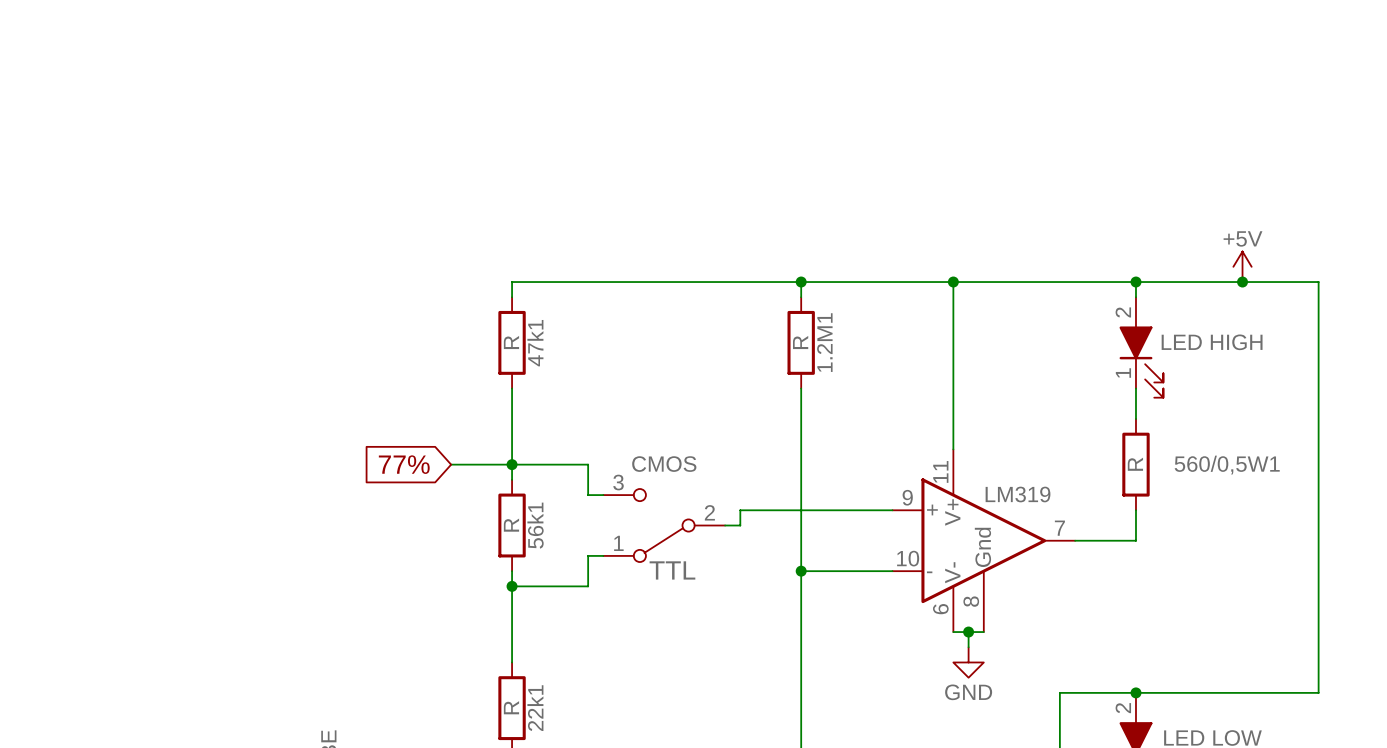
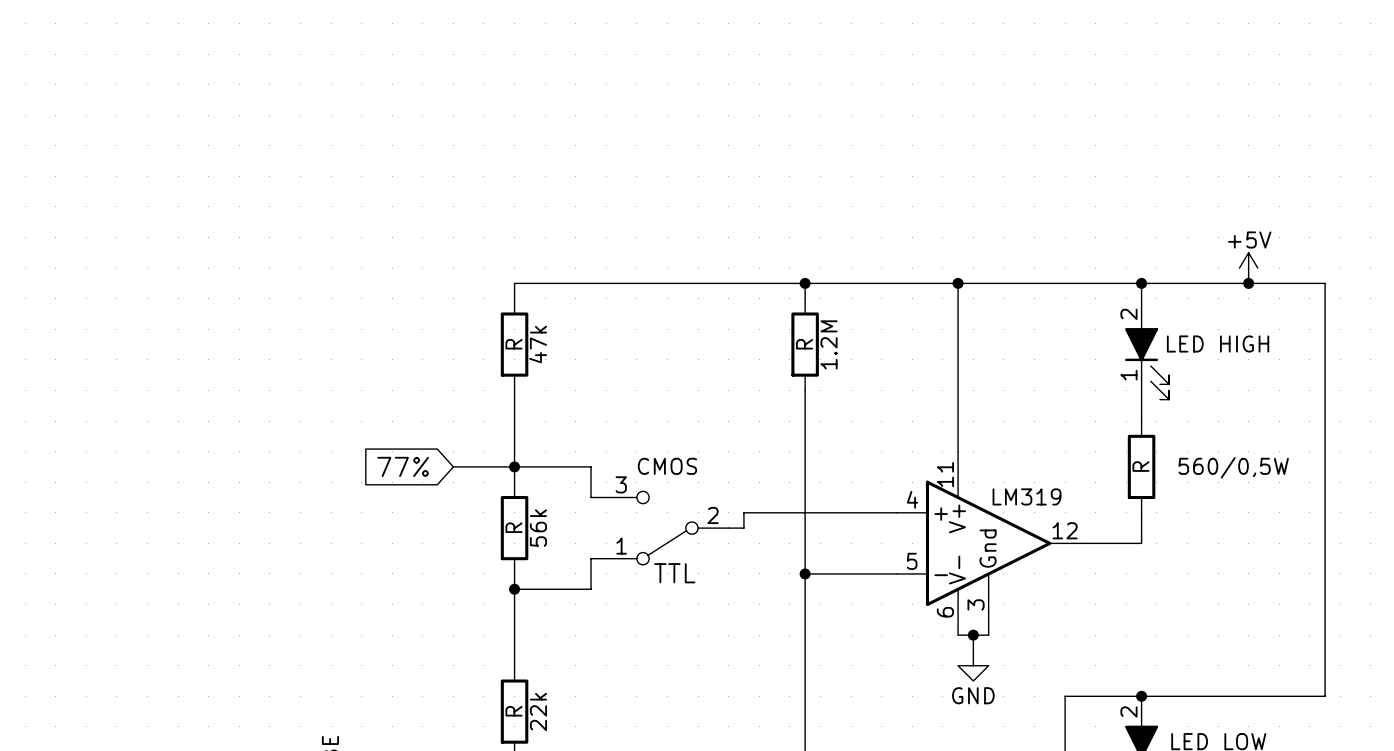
1.2M1 name: 1.2M1 (824, 342) -> 1.2M (829, 344)
47k1 name: 47k1 (535, 343) -> 47k (538, 344)
560/0,5W1 name: 560/0,5W1 (1227, 465) -> 560/0,5W (1233, 467)
part pin number: 9 (907, 497) -> 4 (912, 499)
56k1 name: 56k1 (535, 525) -> 56k (538, 528)
part pin number: 7 (1059, 528) -> 12 (1065, 530)
part pin number: 10 (908, 558) -> 5 (912, 561)
part pin number: 8 (971, 601) -> 3 (976, 604)
22k1 name: 22k1 (535, 708) -> 22k (538, 711)

